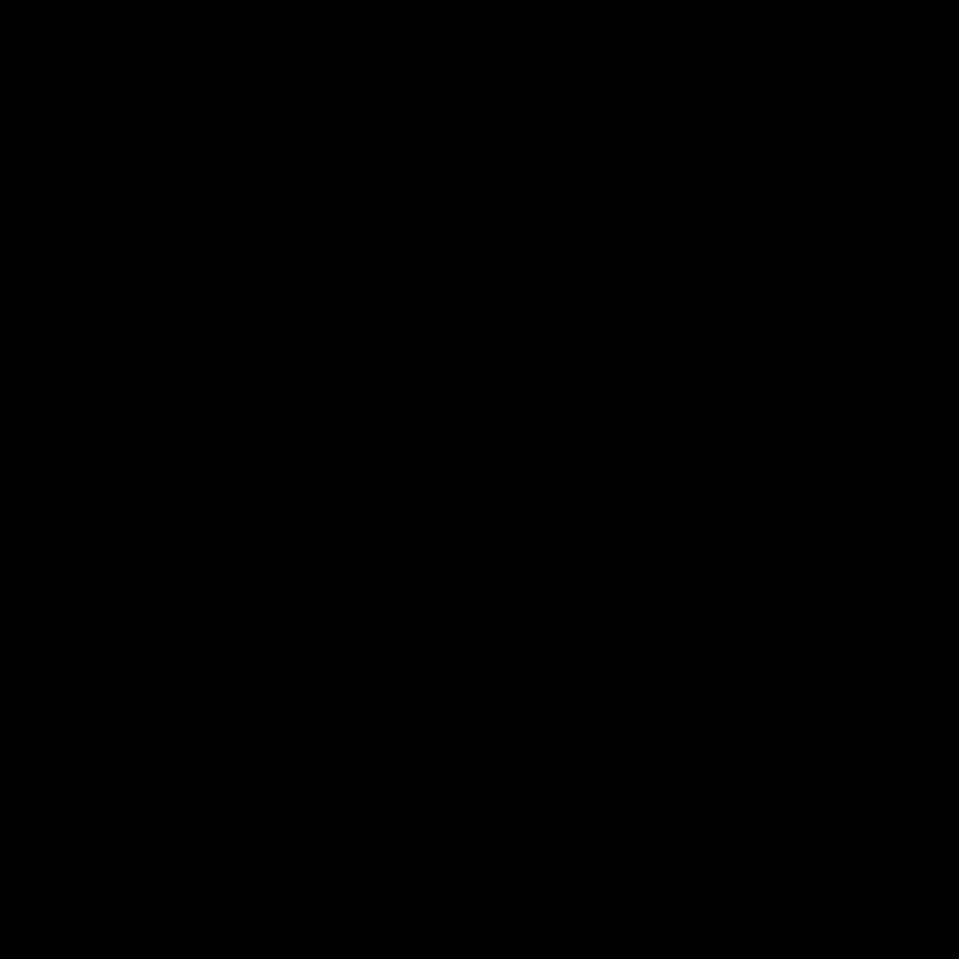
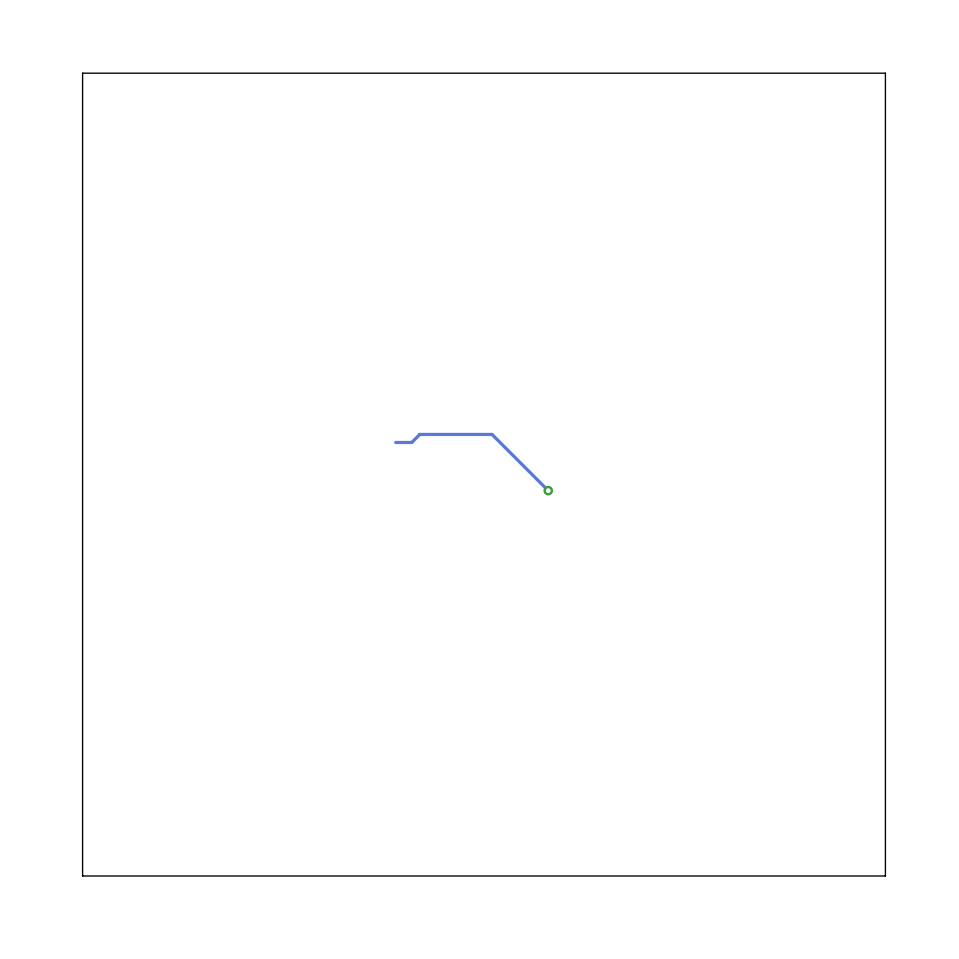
board edge: none -> (885, 73) (82, 73) (82, 876) (885, 876) (885, 73)
track: none -> (395, 442) (411, 442) (419, 434) (492, 434) (548, 490)
via: none -> (548, 490)

